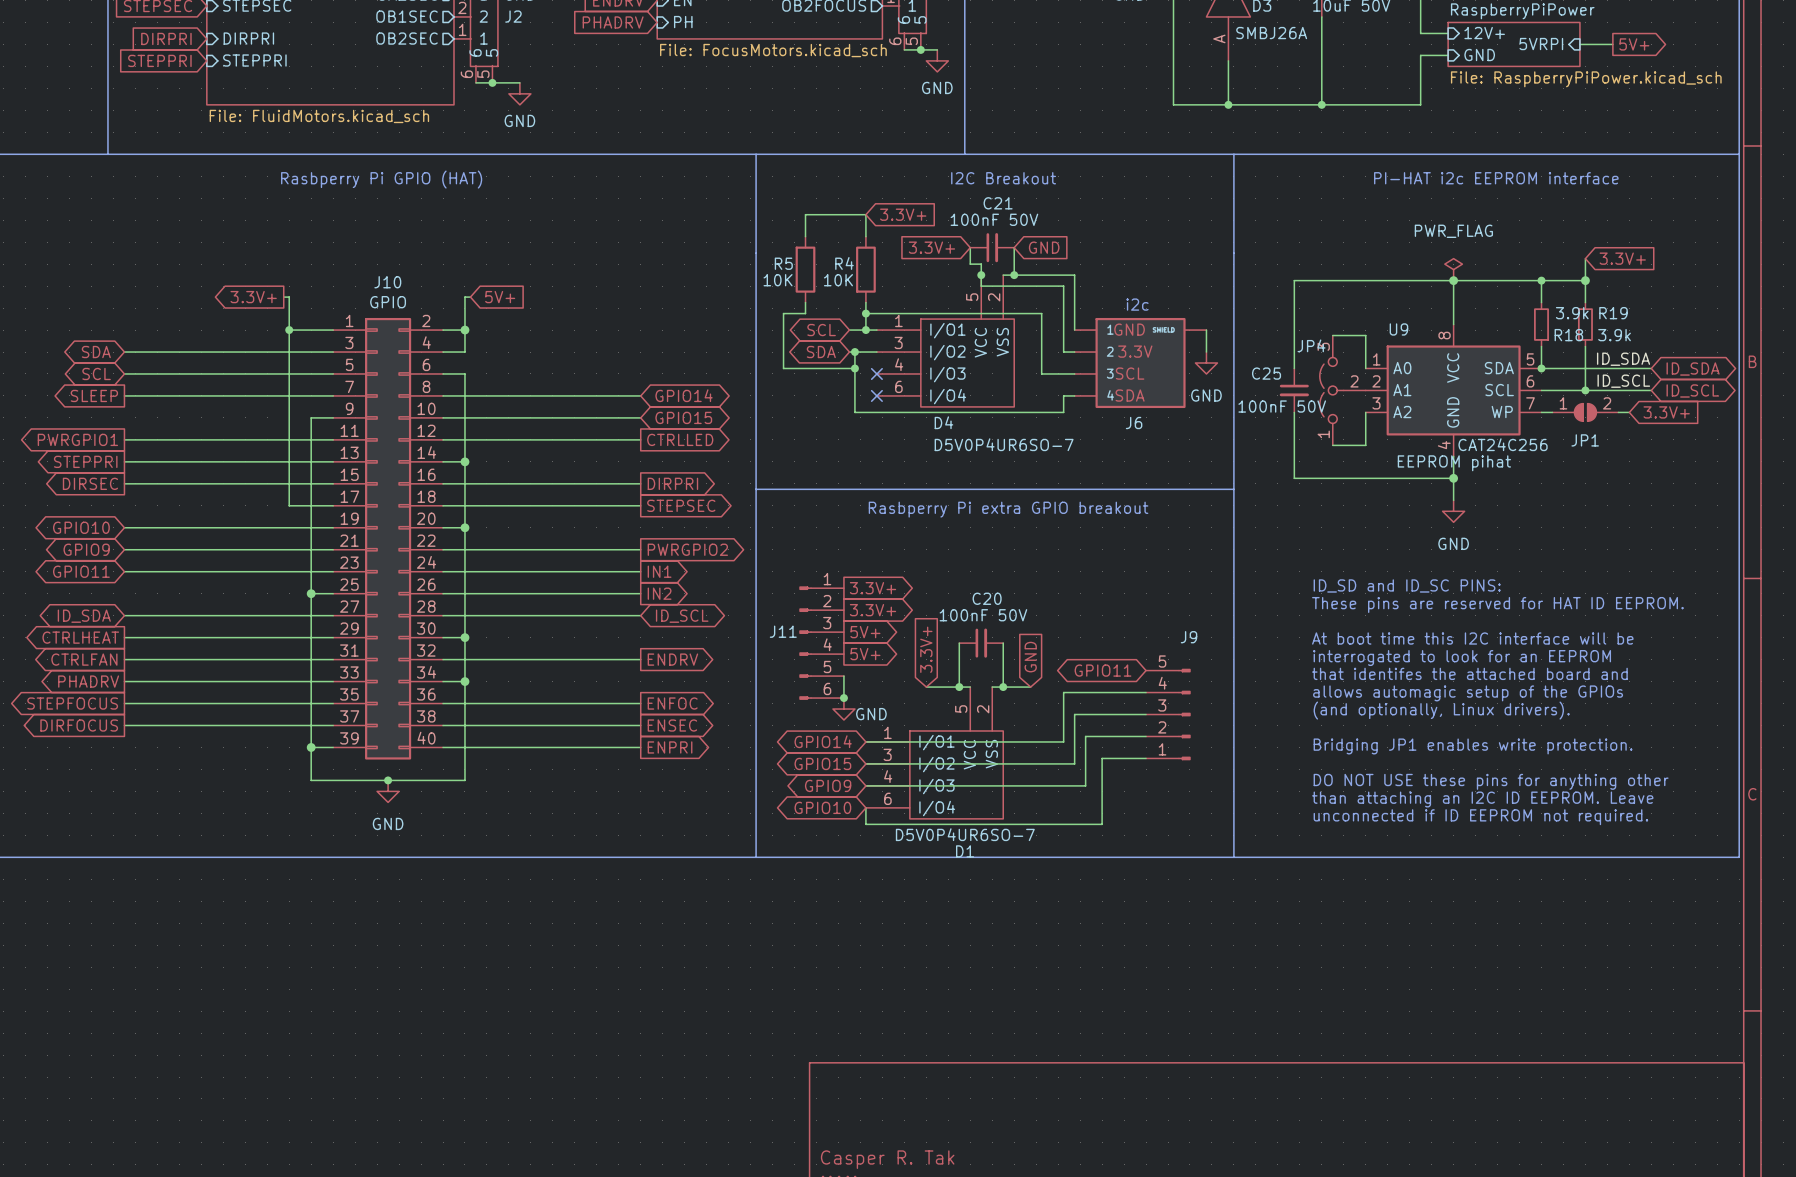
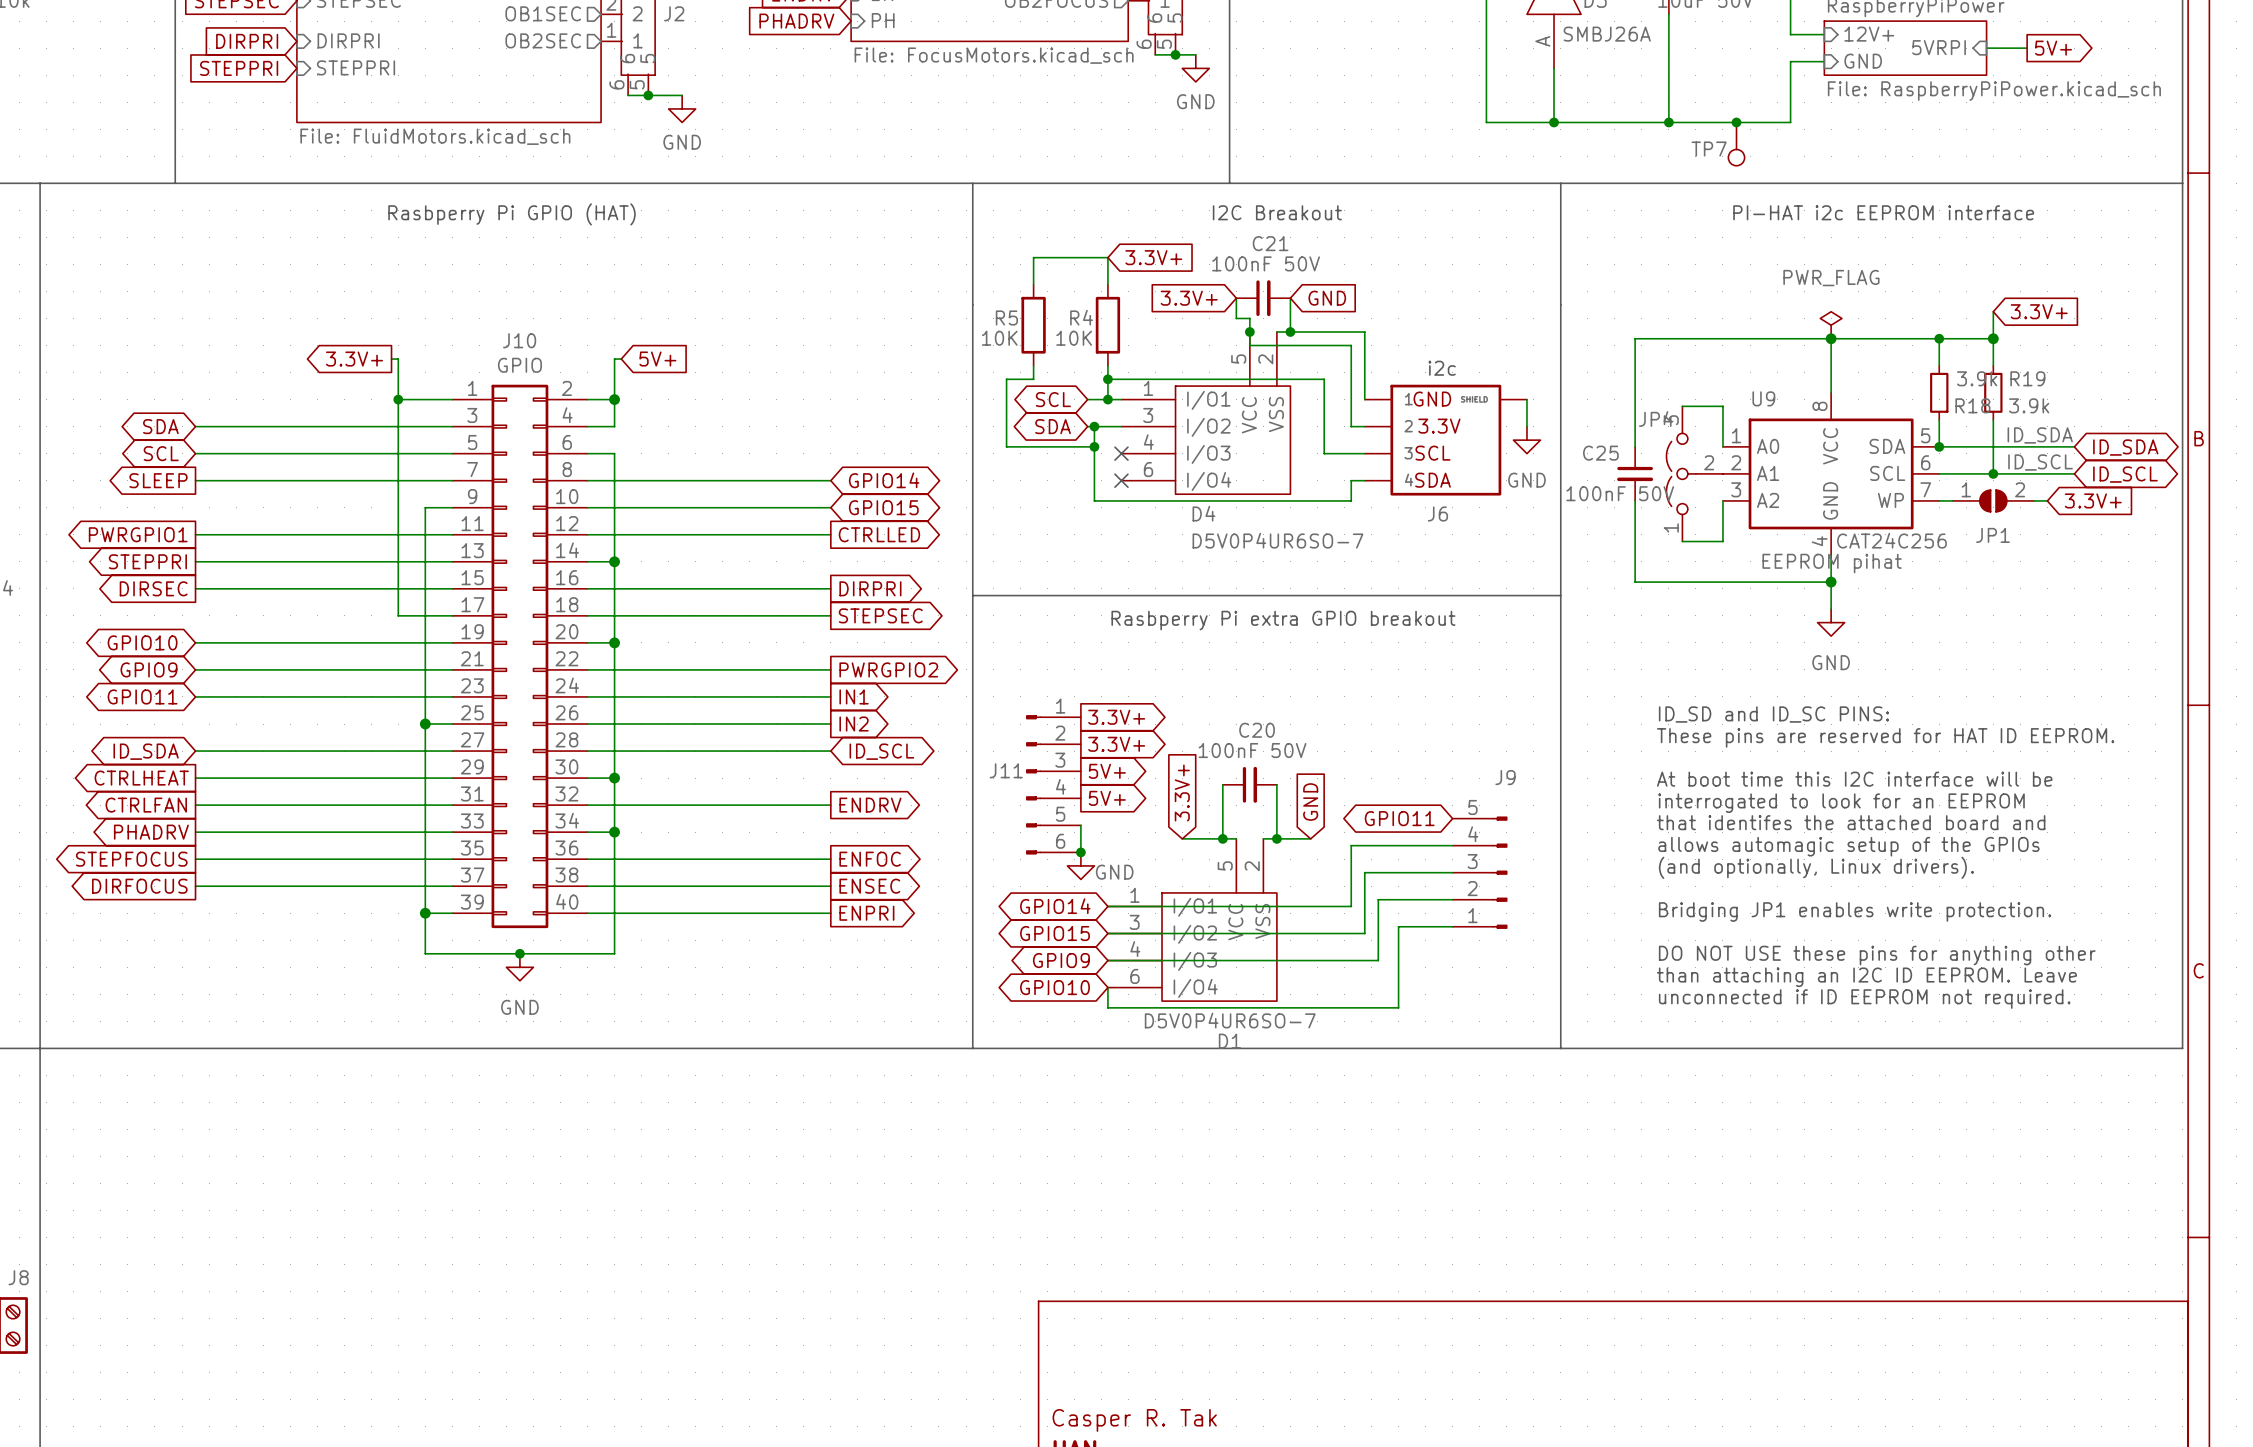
junction: none -> (1736, 122)
TP7: none -> (1736, 144)

